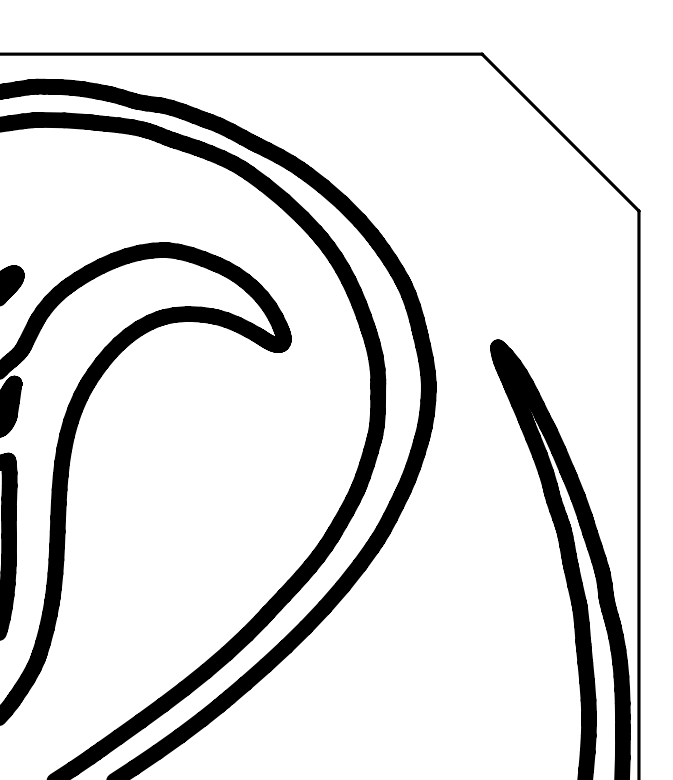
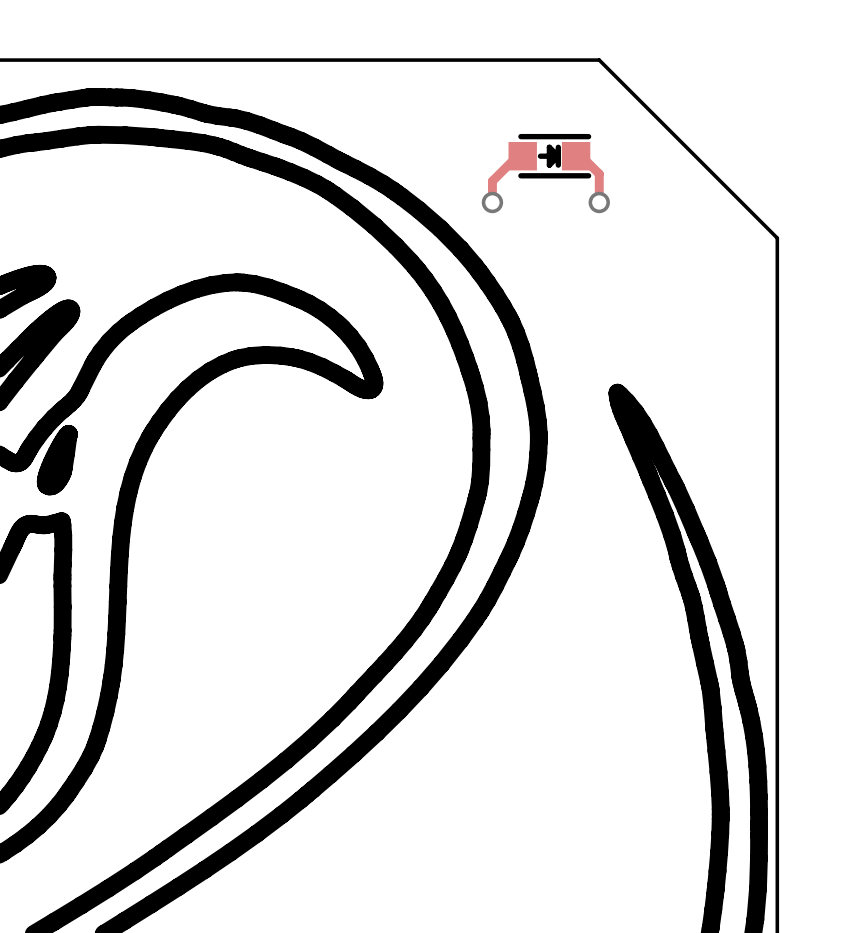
track: none -> (522, 156) (517, 156) (492, 181) (492, 202)
part: none -> (549, 156)
track: none -> (576, 156) (581, 156) (599, 174) (599, 202)
via: none -> (492, 202)
via: none -> (599, 202)

